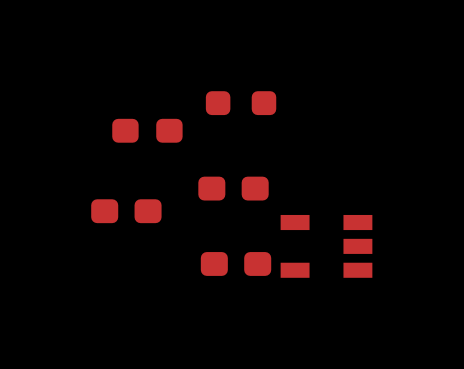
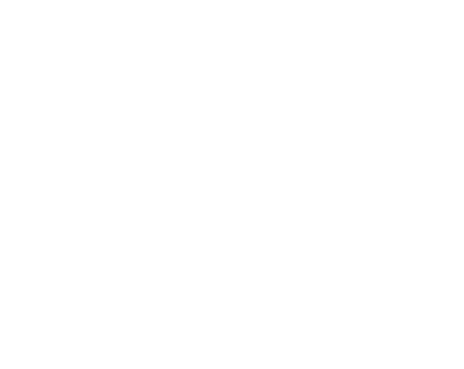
part: (241, 103) -> none
part: (147, 130) -> none
part: (233, 188) -> none
part: (126, 211) -> none
part: (326, 246) -> none
part: (236, 263) -> none

